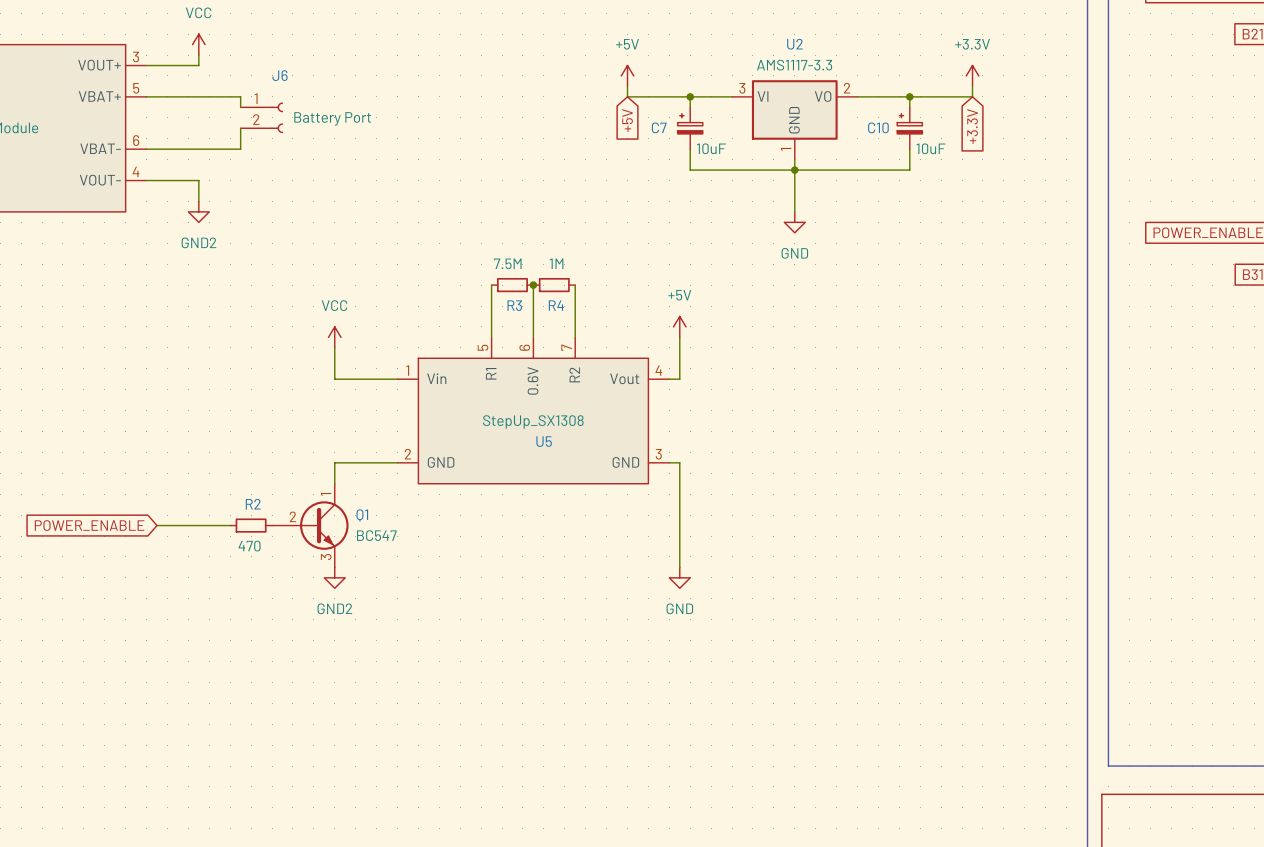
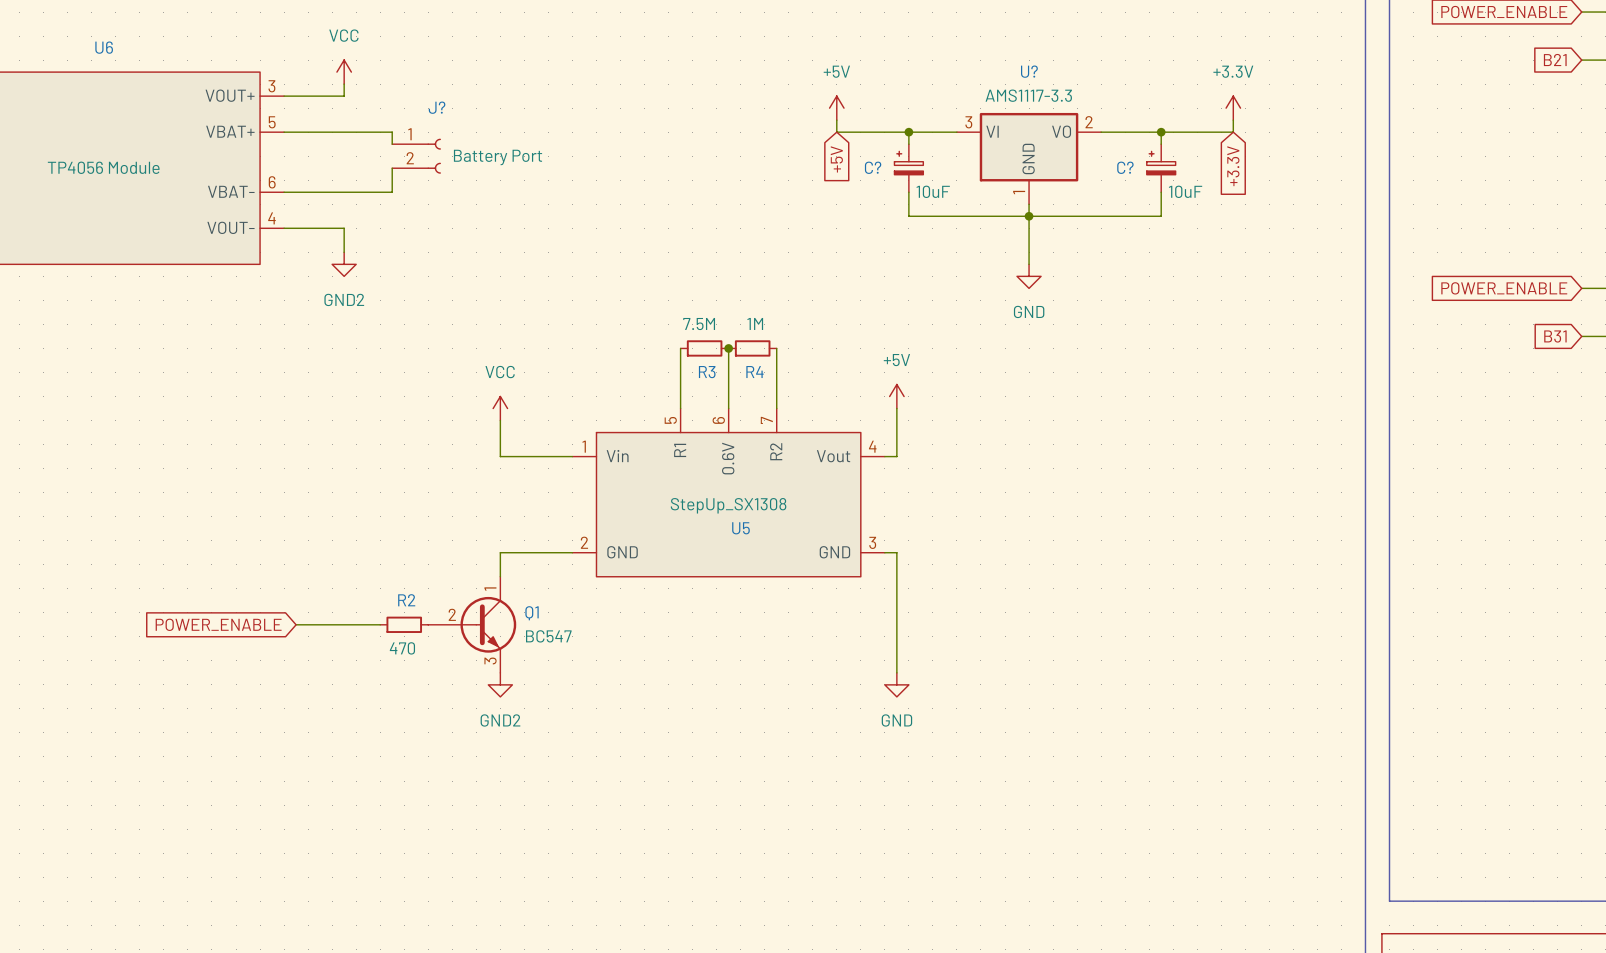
U2 name: U2 (794, 44) -> U? (1029, 71)
J6 name: J6 (280, 75) -> J? (437, 107)
C7 name: C7 (659, 127) -> C? (873, 167)
C10 name: C10 (878, 127) -> C? (1125, 167)

